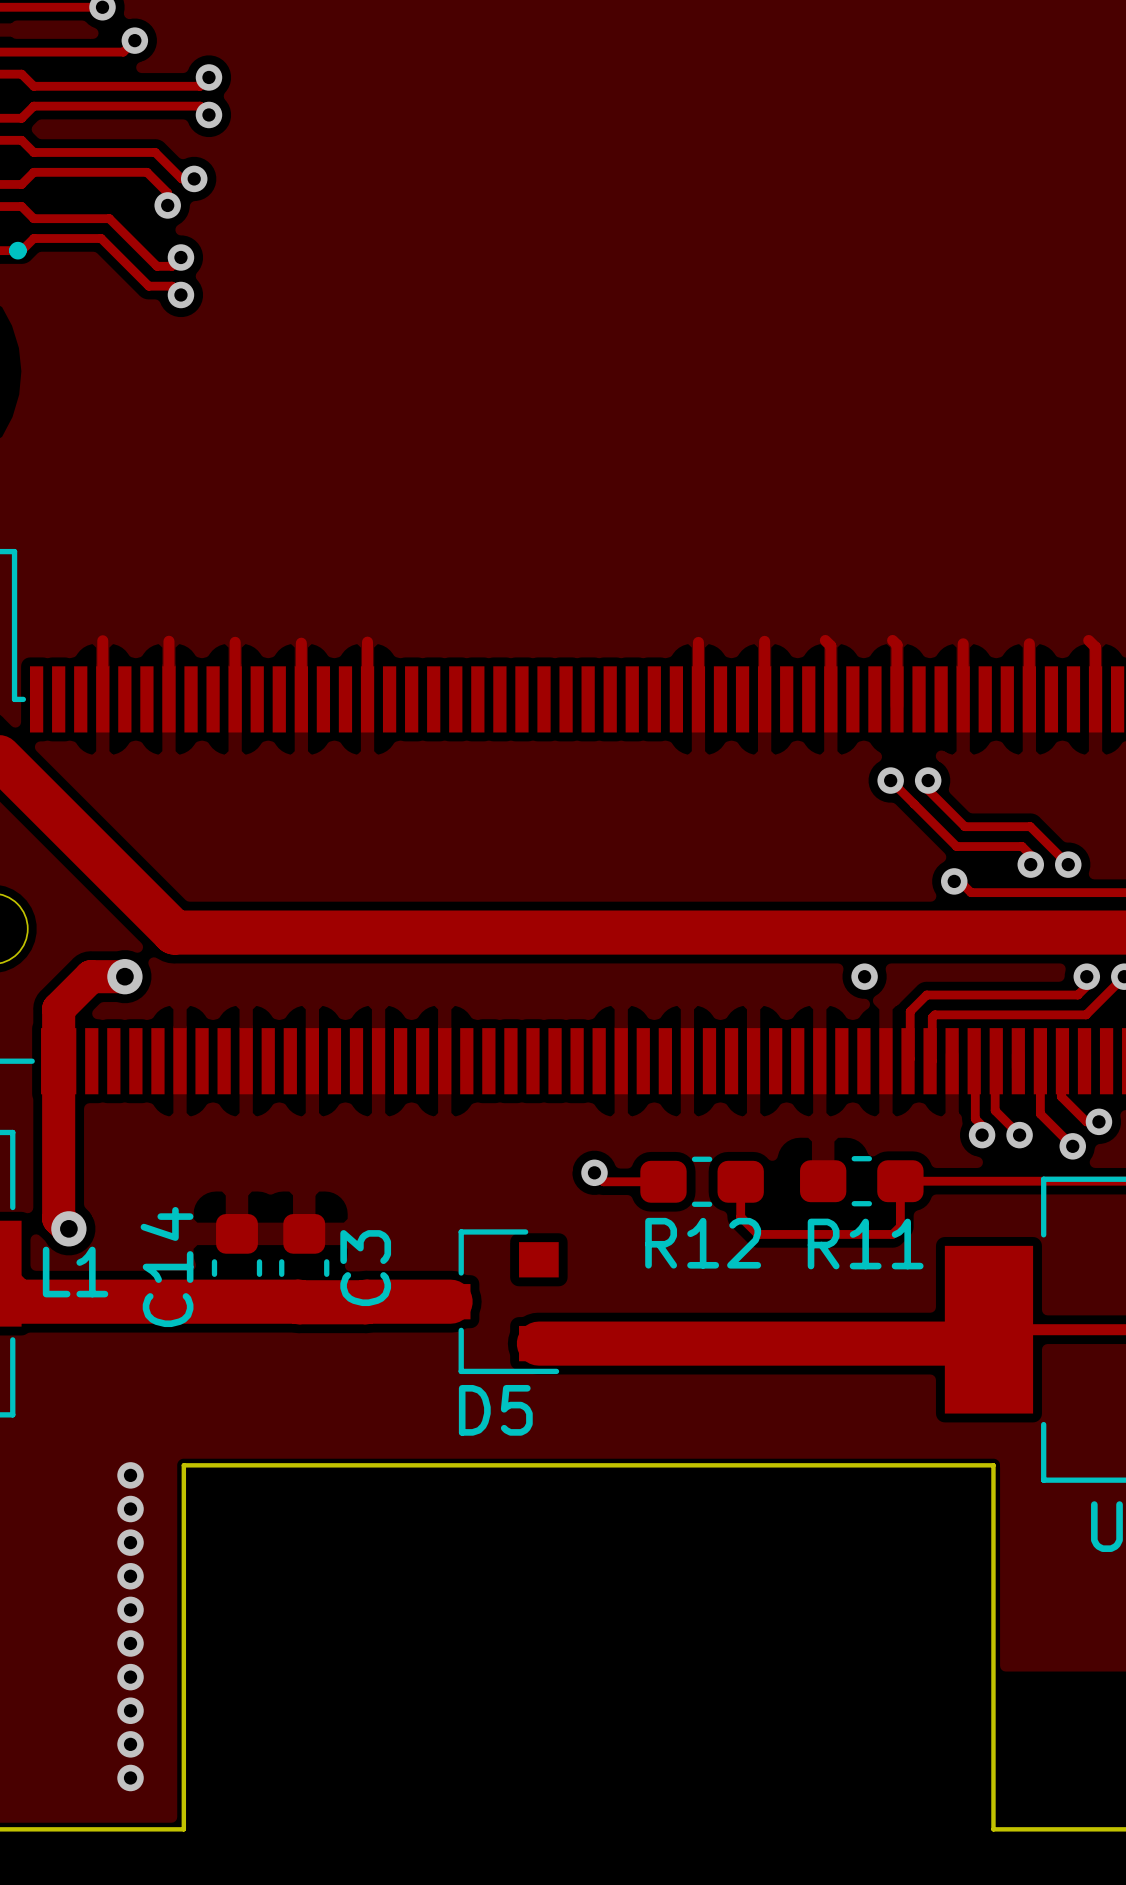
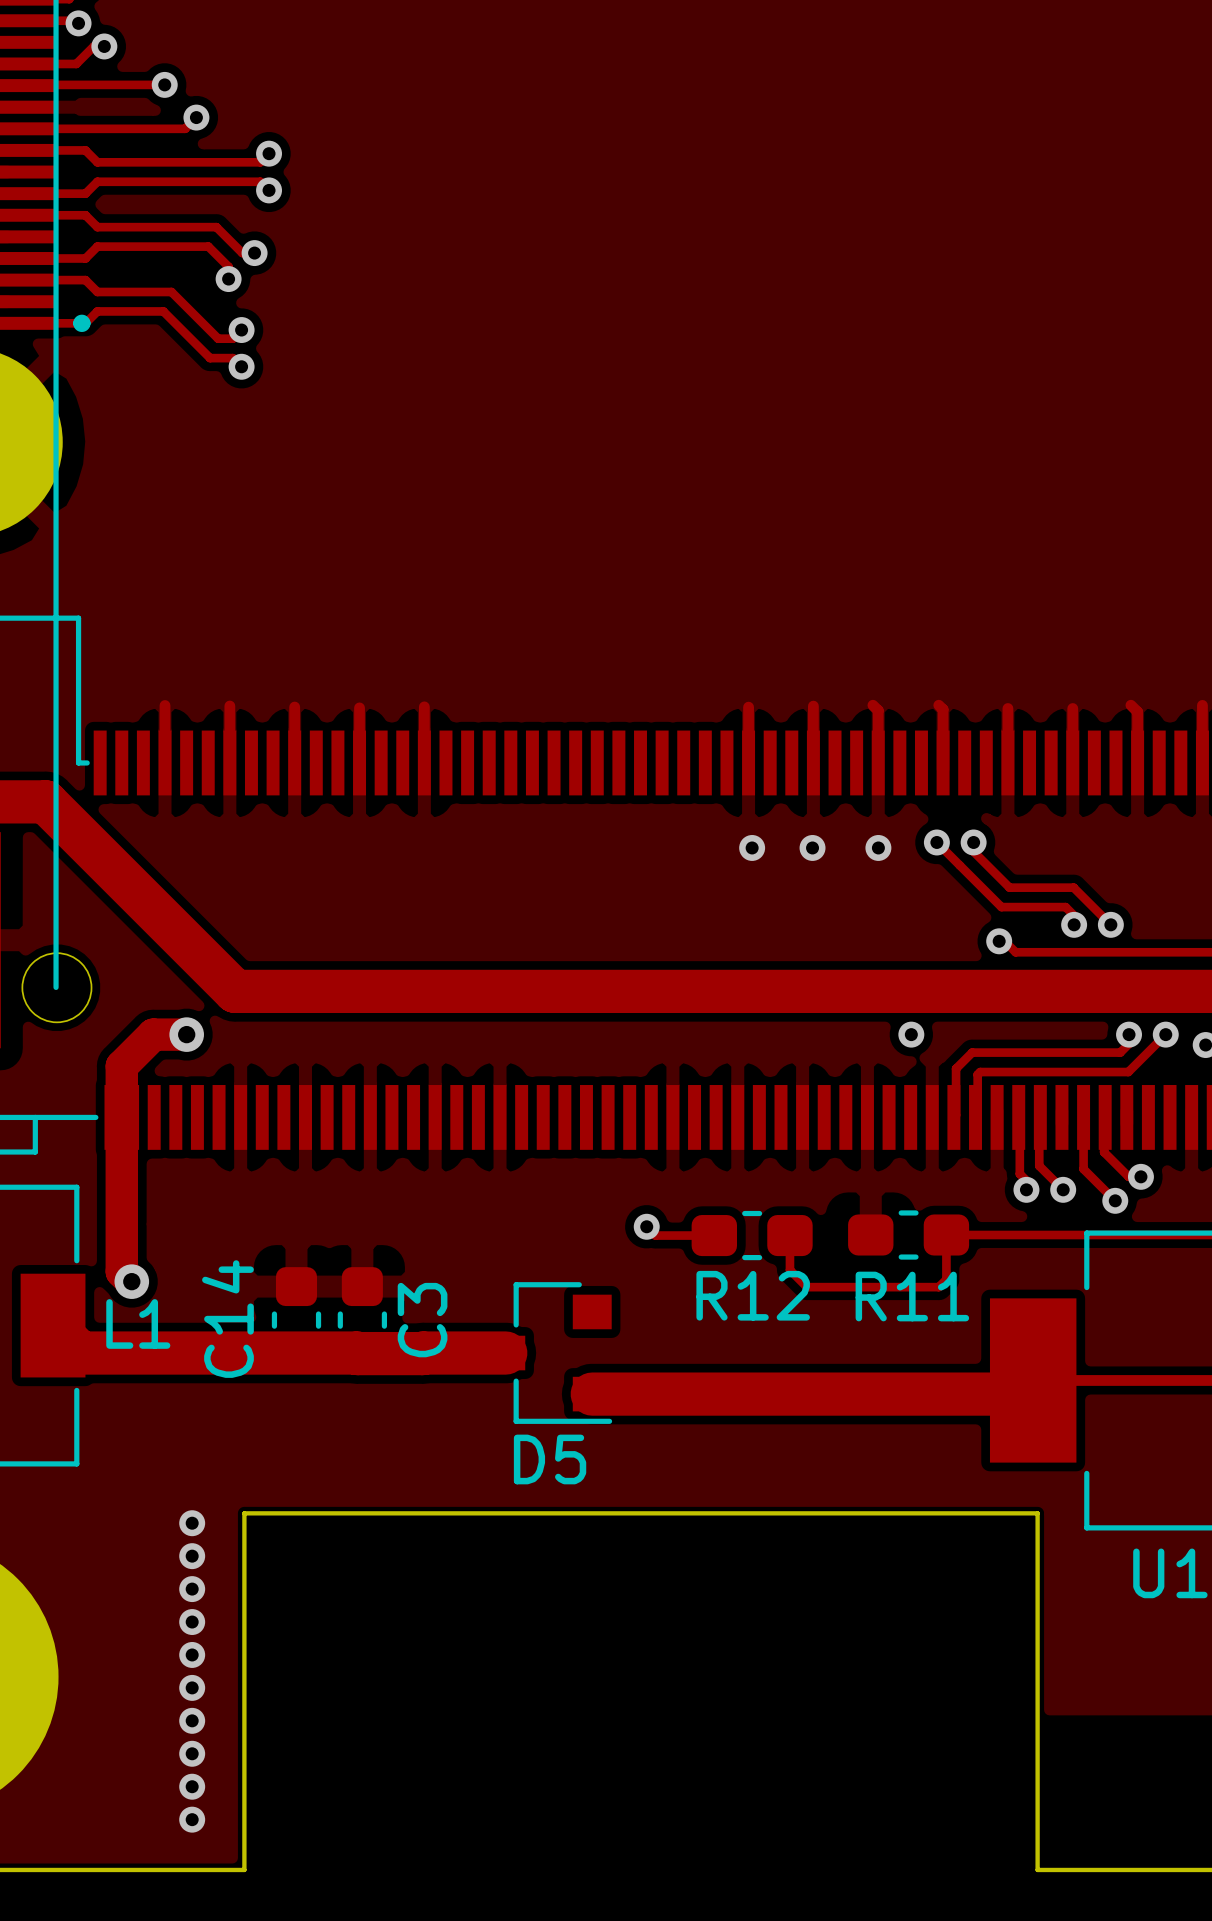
via: none -> (752, 847)
via: none -> (812, 847)
via: none -> (878, 847)

